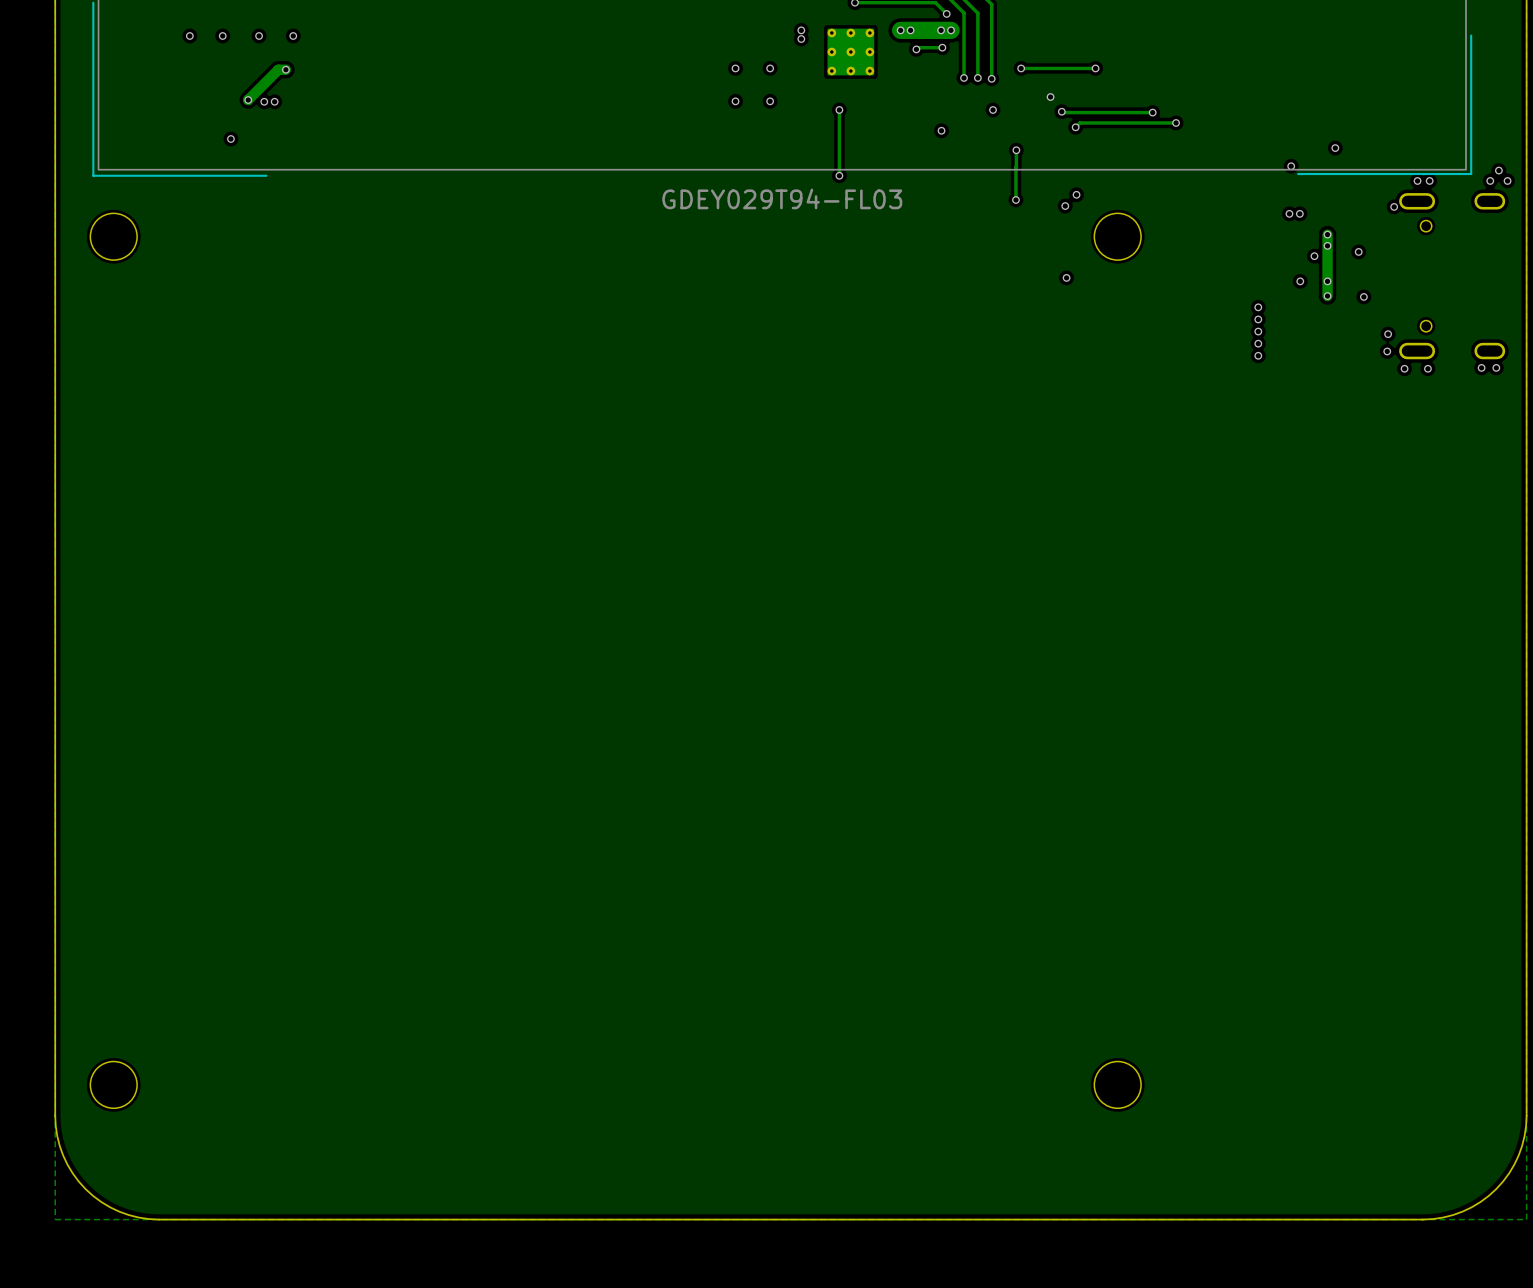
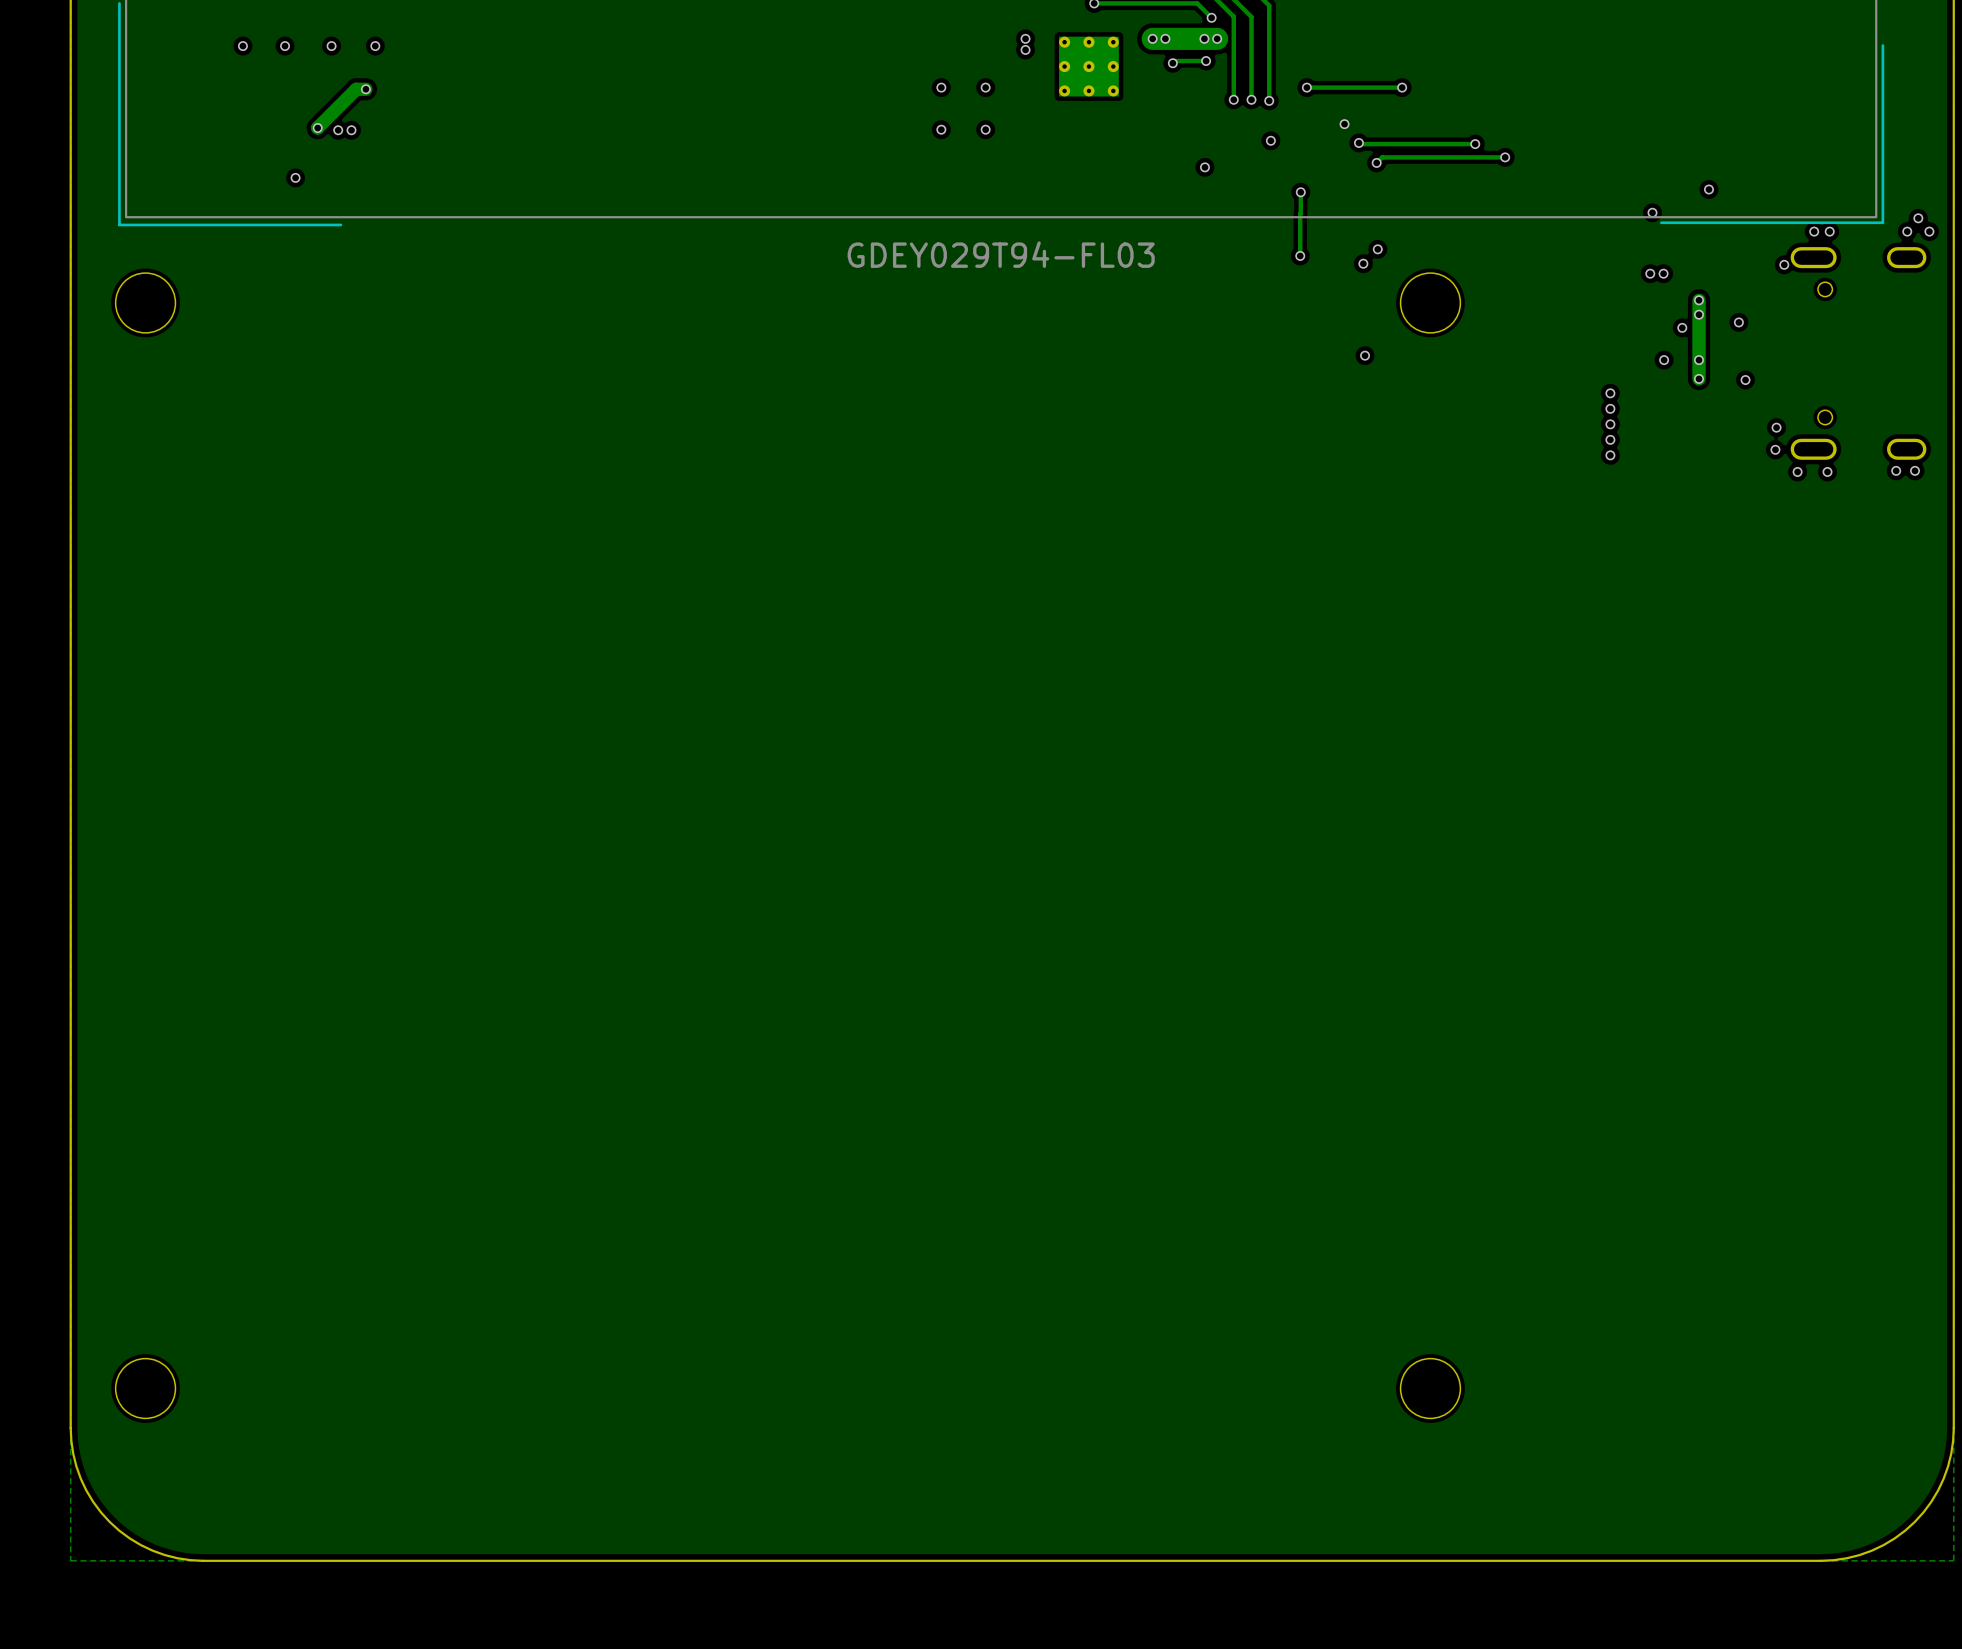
track: (839, 109) (839, 175) -> none
via: (839, 109) -> none
via: (839, 175) -> none

